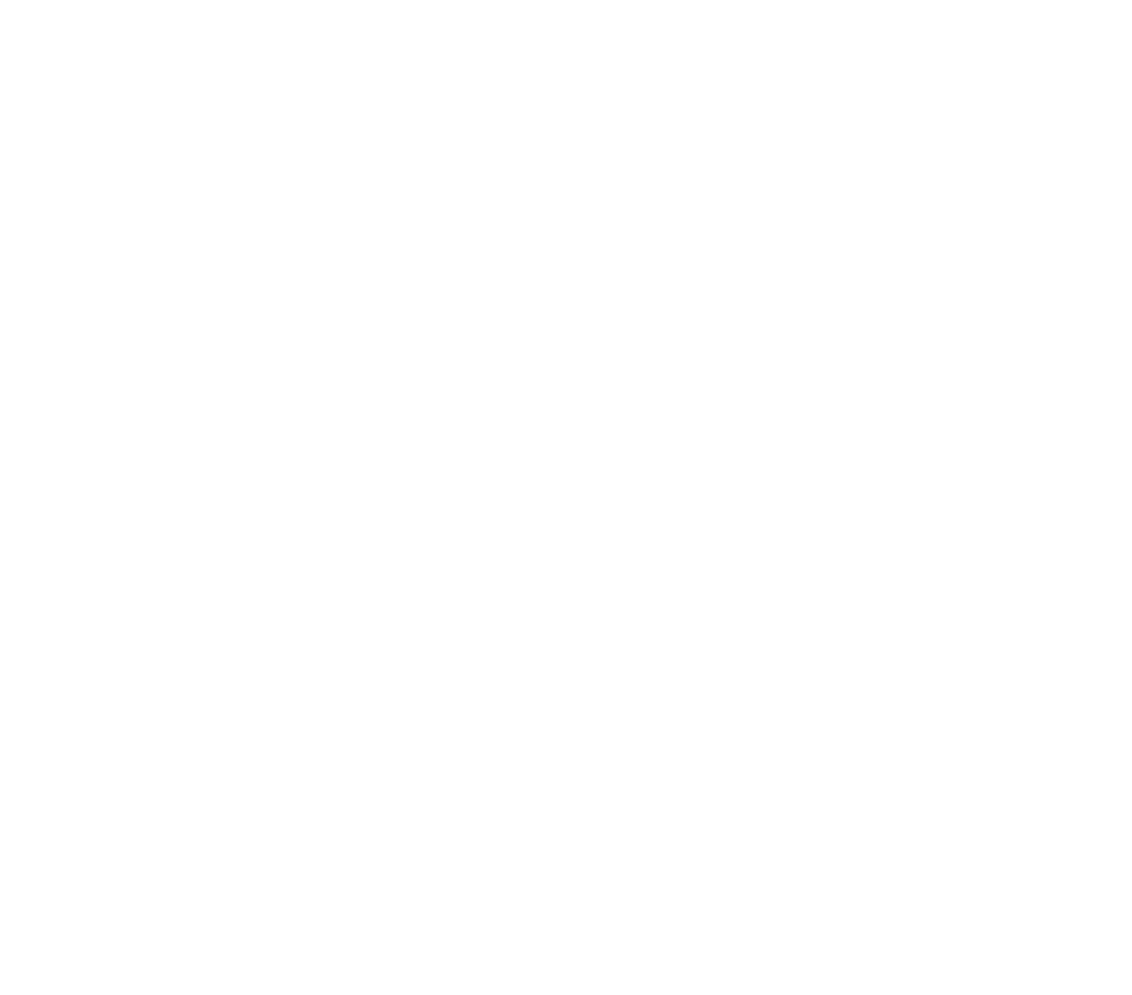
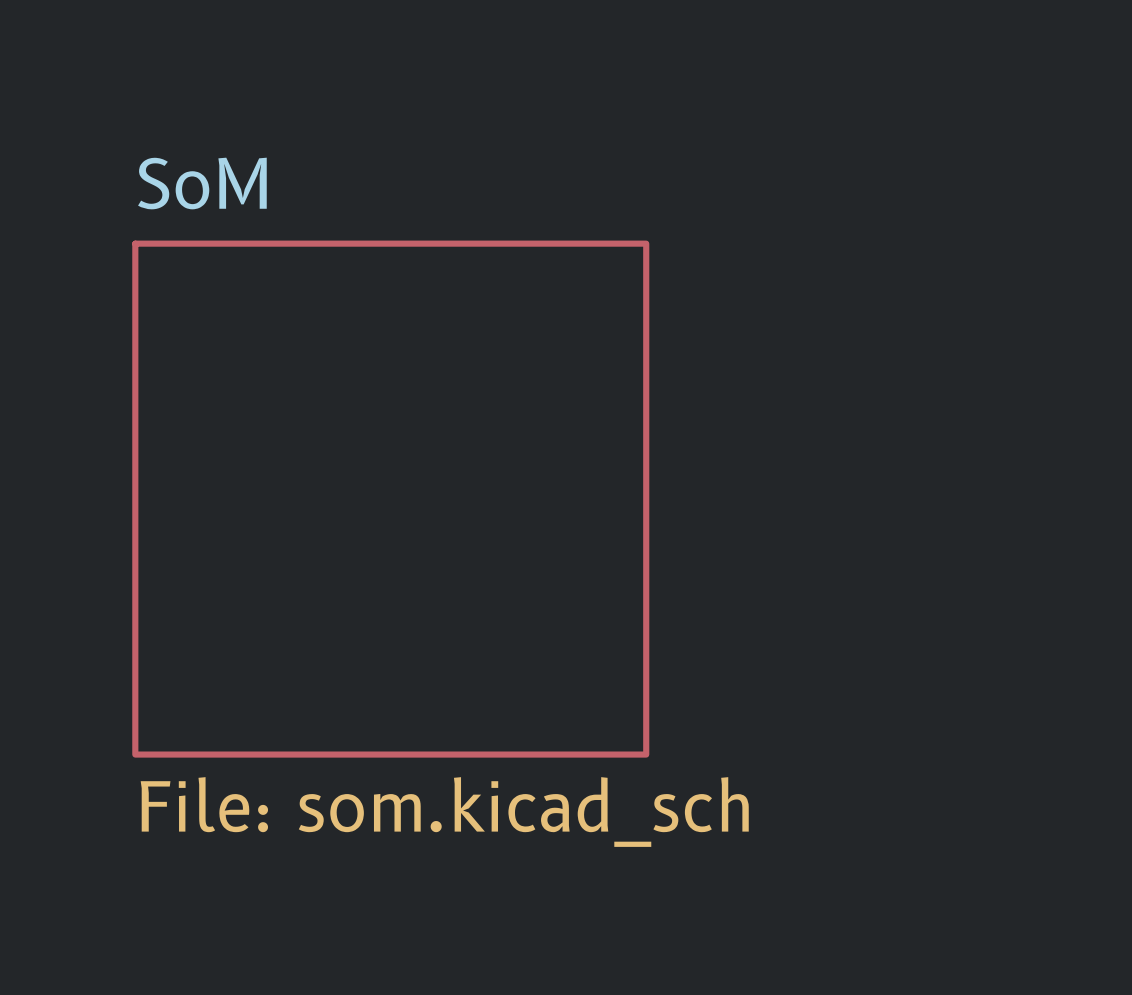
sheet SoM: none -> File: som.kicad_sch (390, 499)

